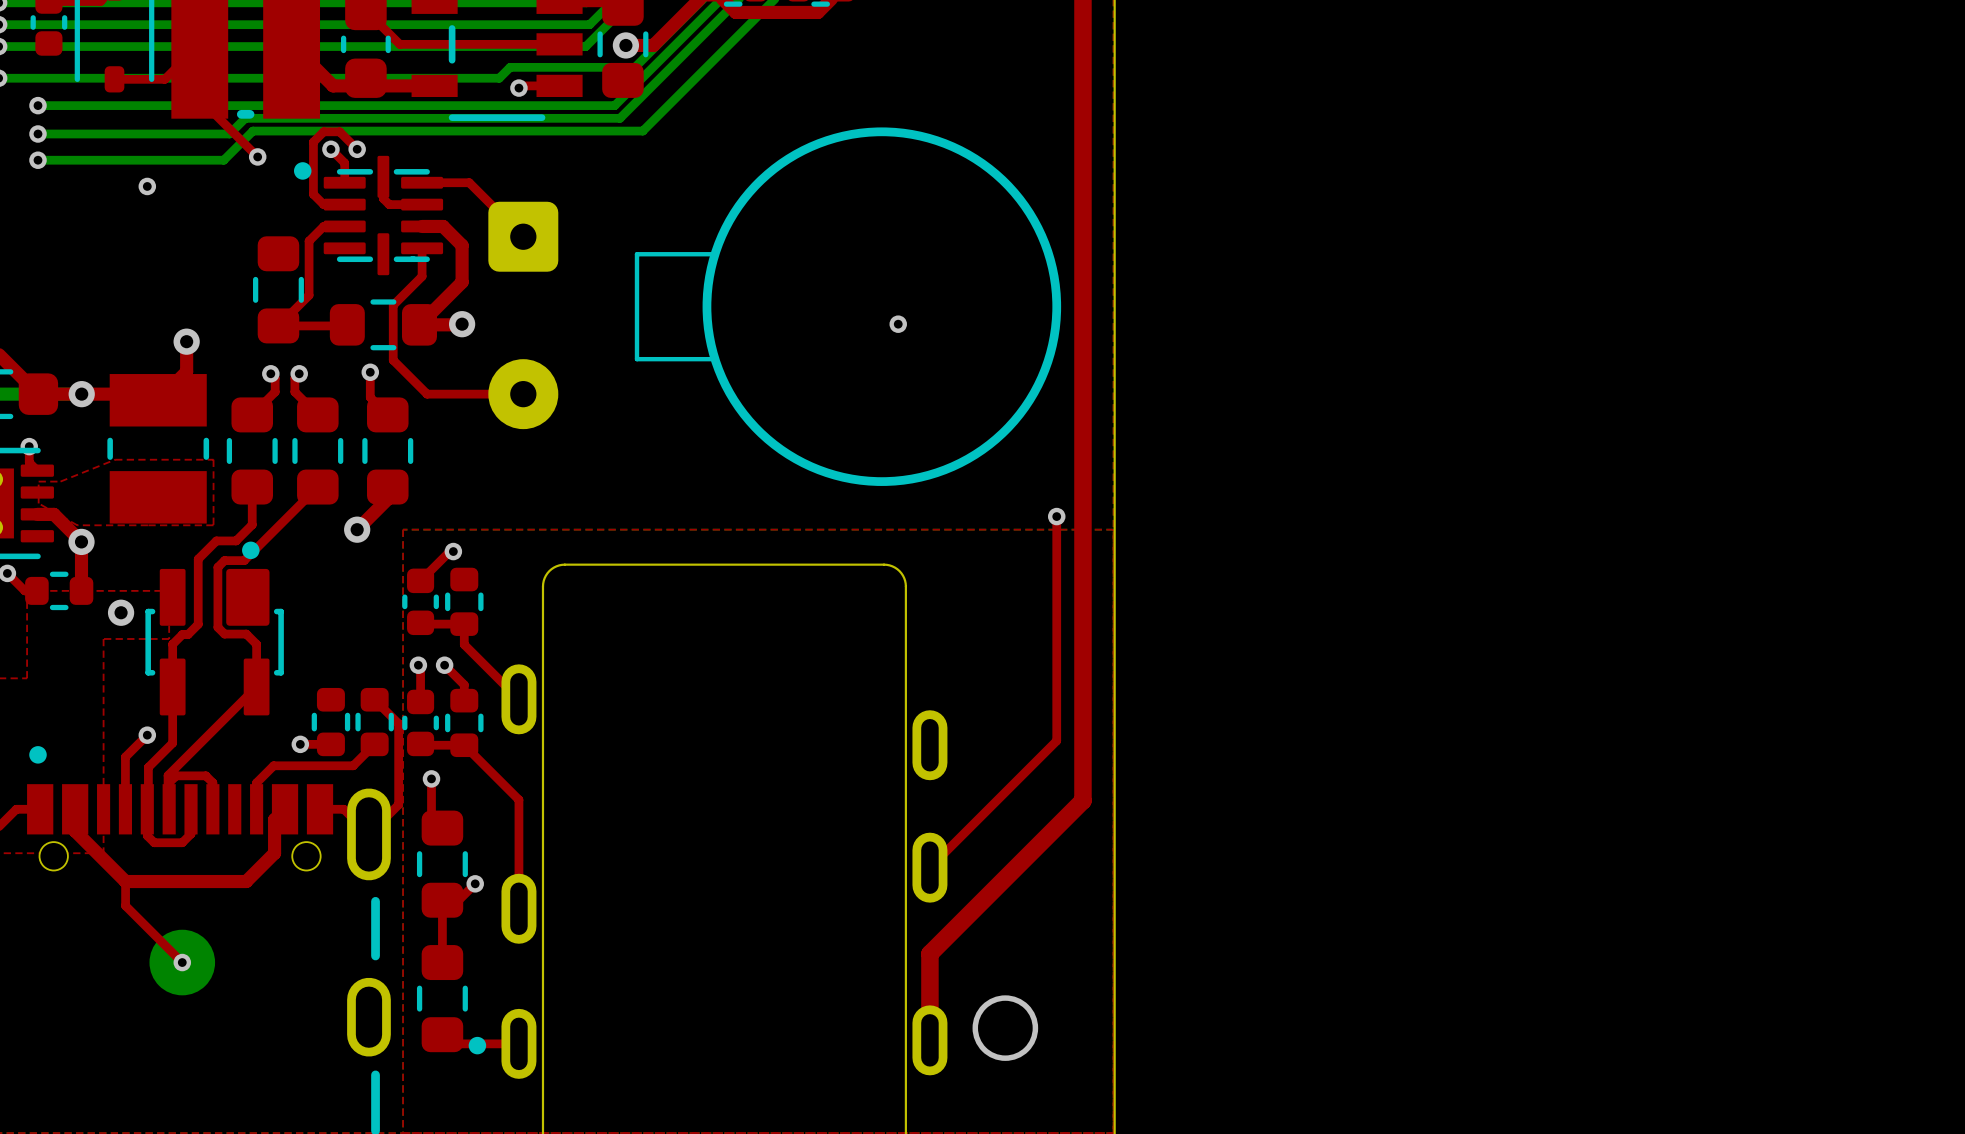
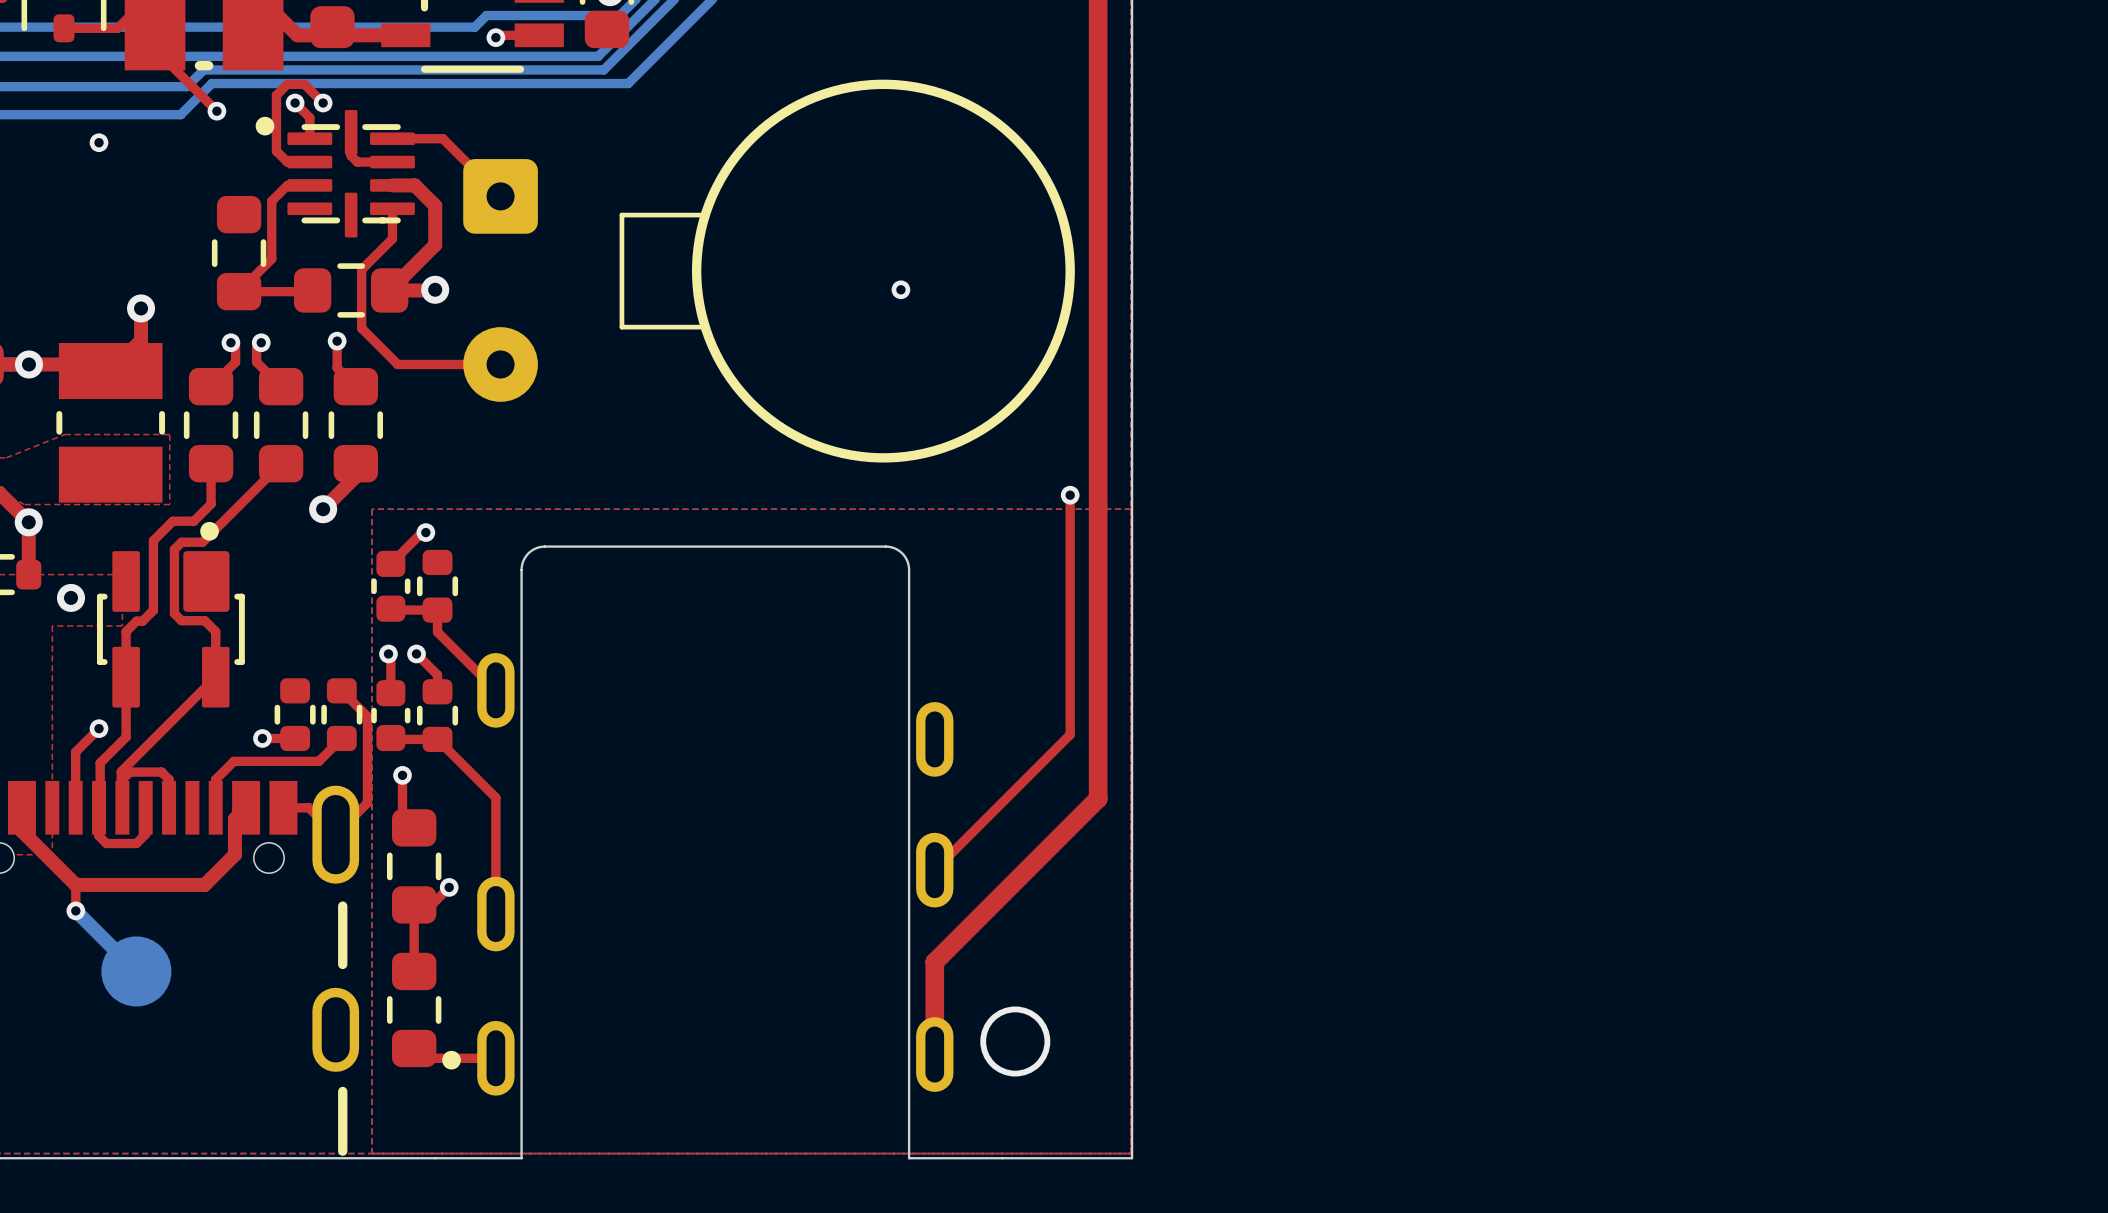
top track: (125, 905) (182, 962) -> none
bottom track: none -> (75, 910) (136, 971)
via position: (182, 962) -> (75, 910)

